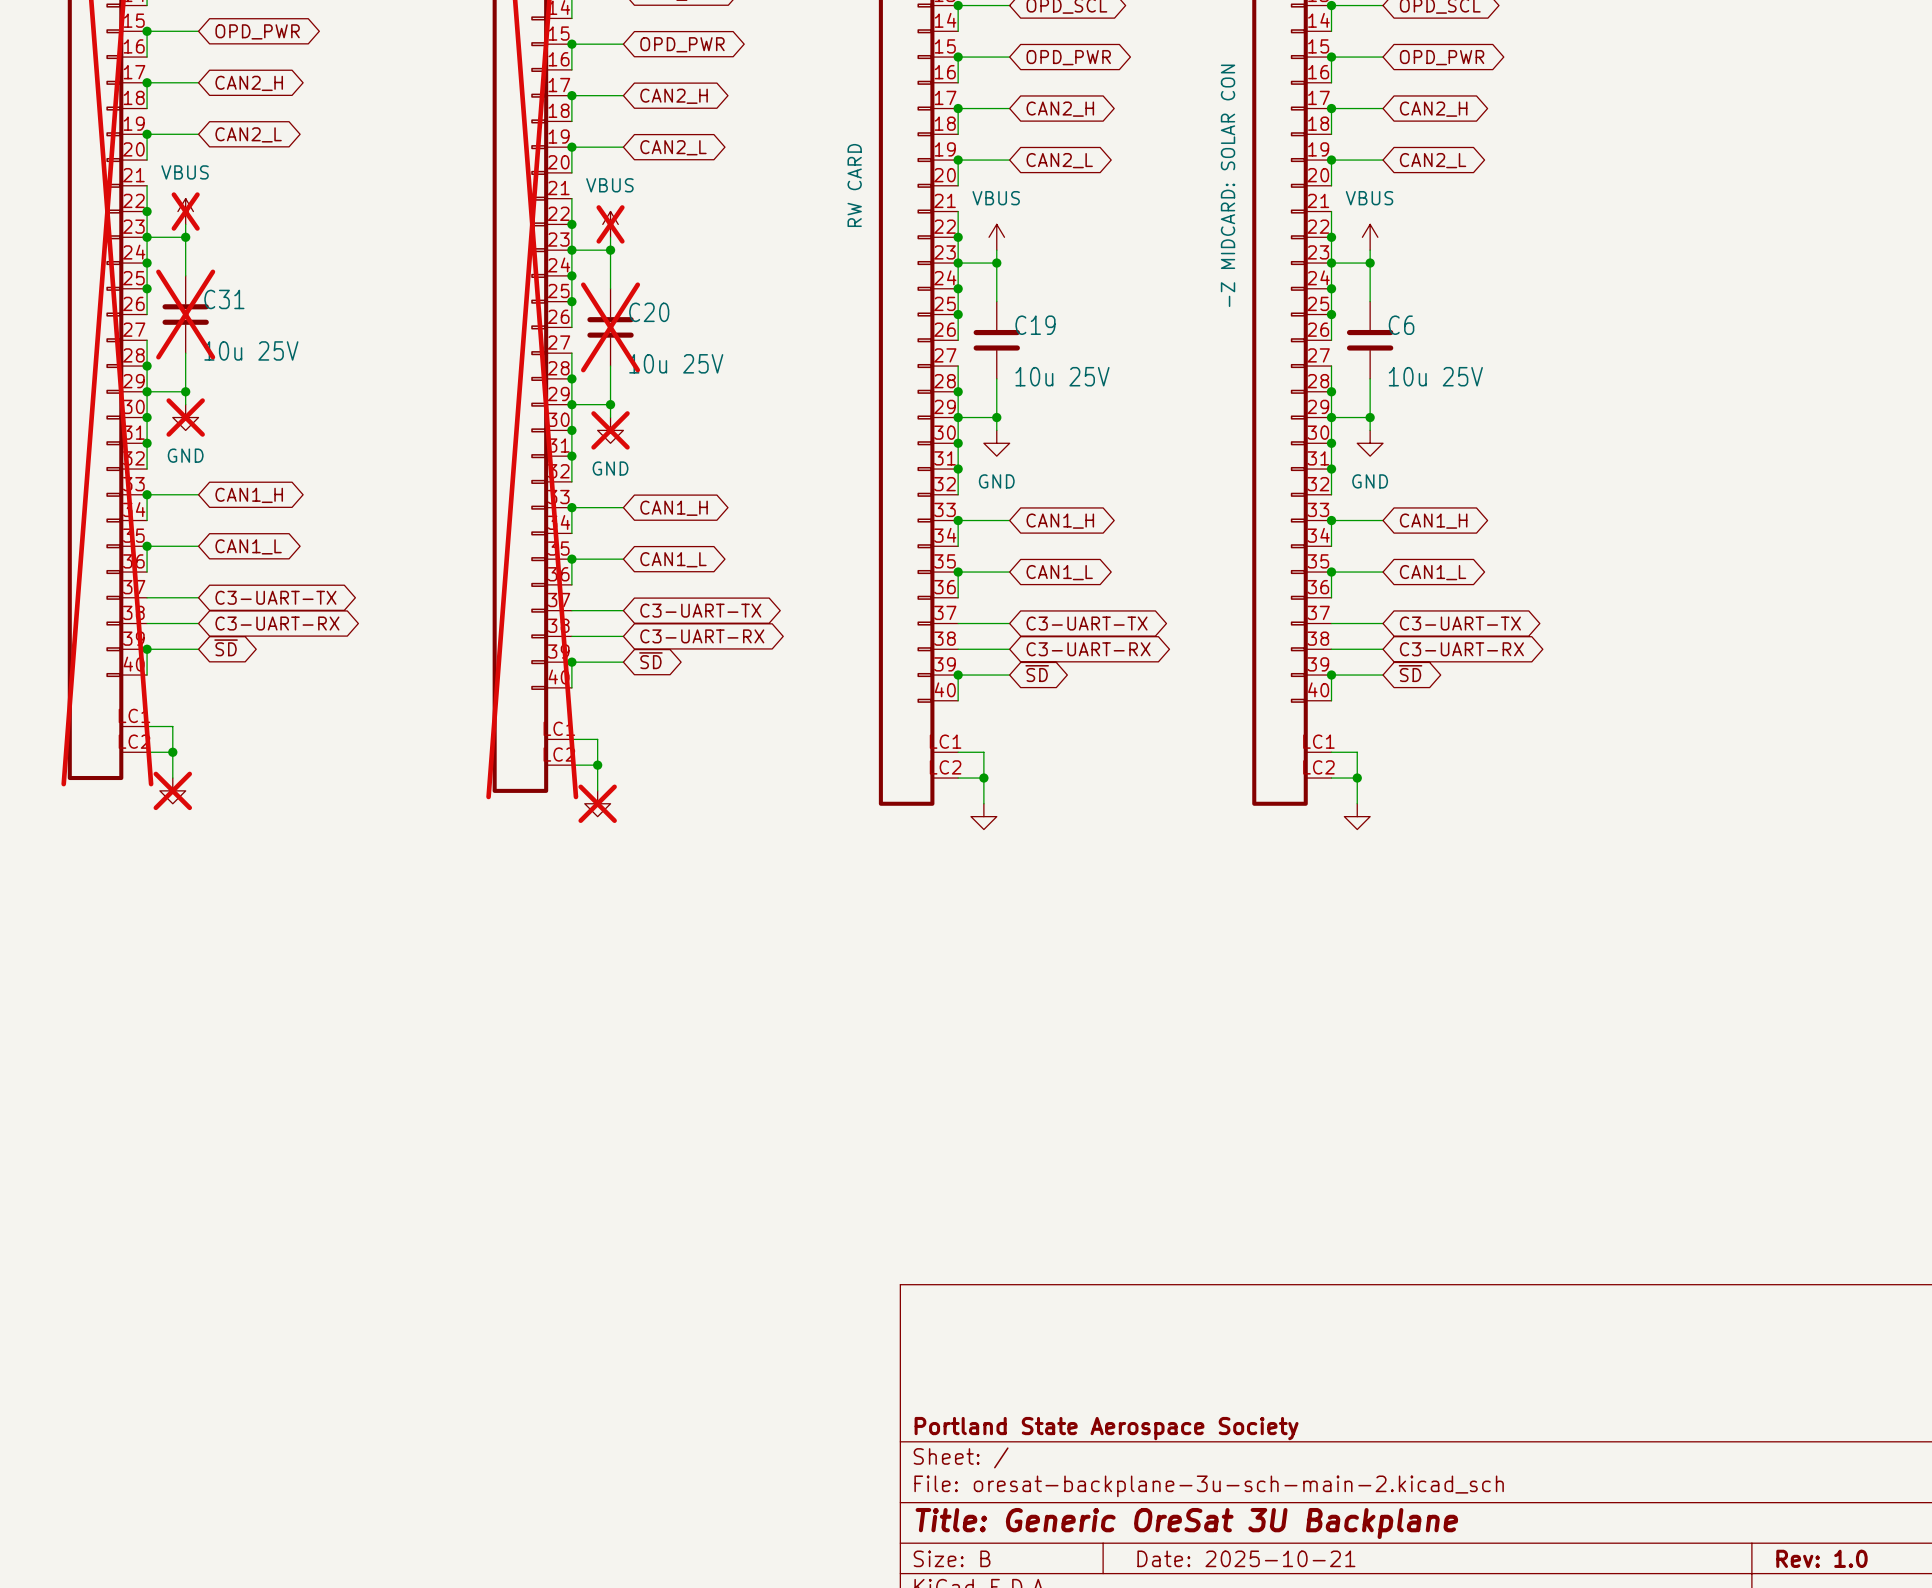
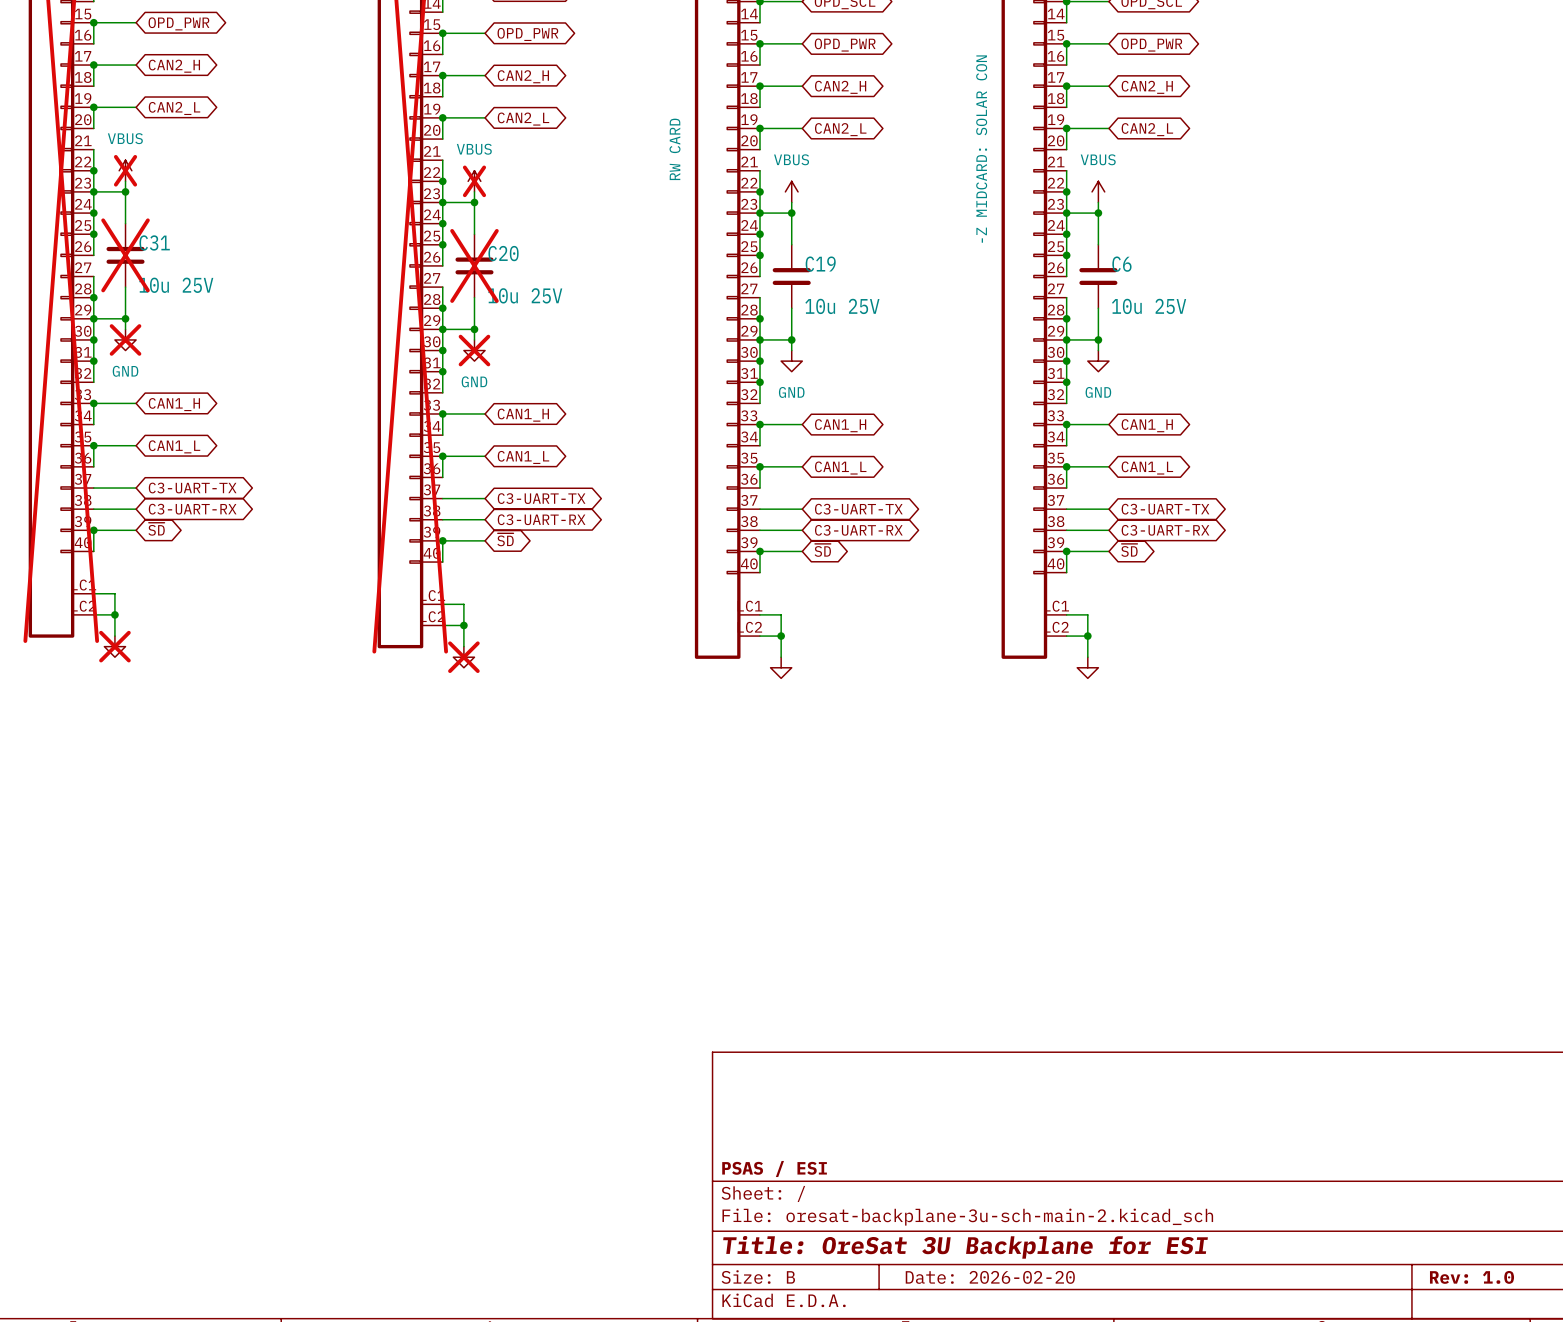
title block: Portland State Aerospace Society (1106, 1428) -> PSAS / ESI (774, 1168)
title block: Title: Generic OreSat 3U Backplane (1186, 1523) -> Title: OreSat 3U Backplane for ESI (965, 1247)
title block: Date: 2025-10-21 (1246, 1558) -> Date: 2026-02-20 (990, 1277)

